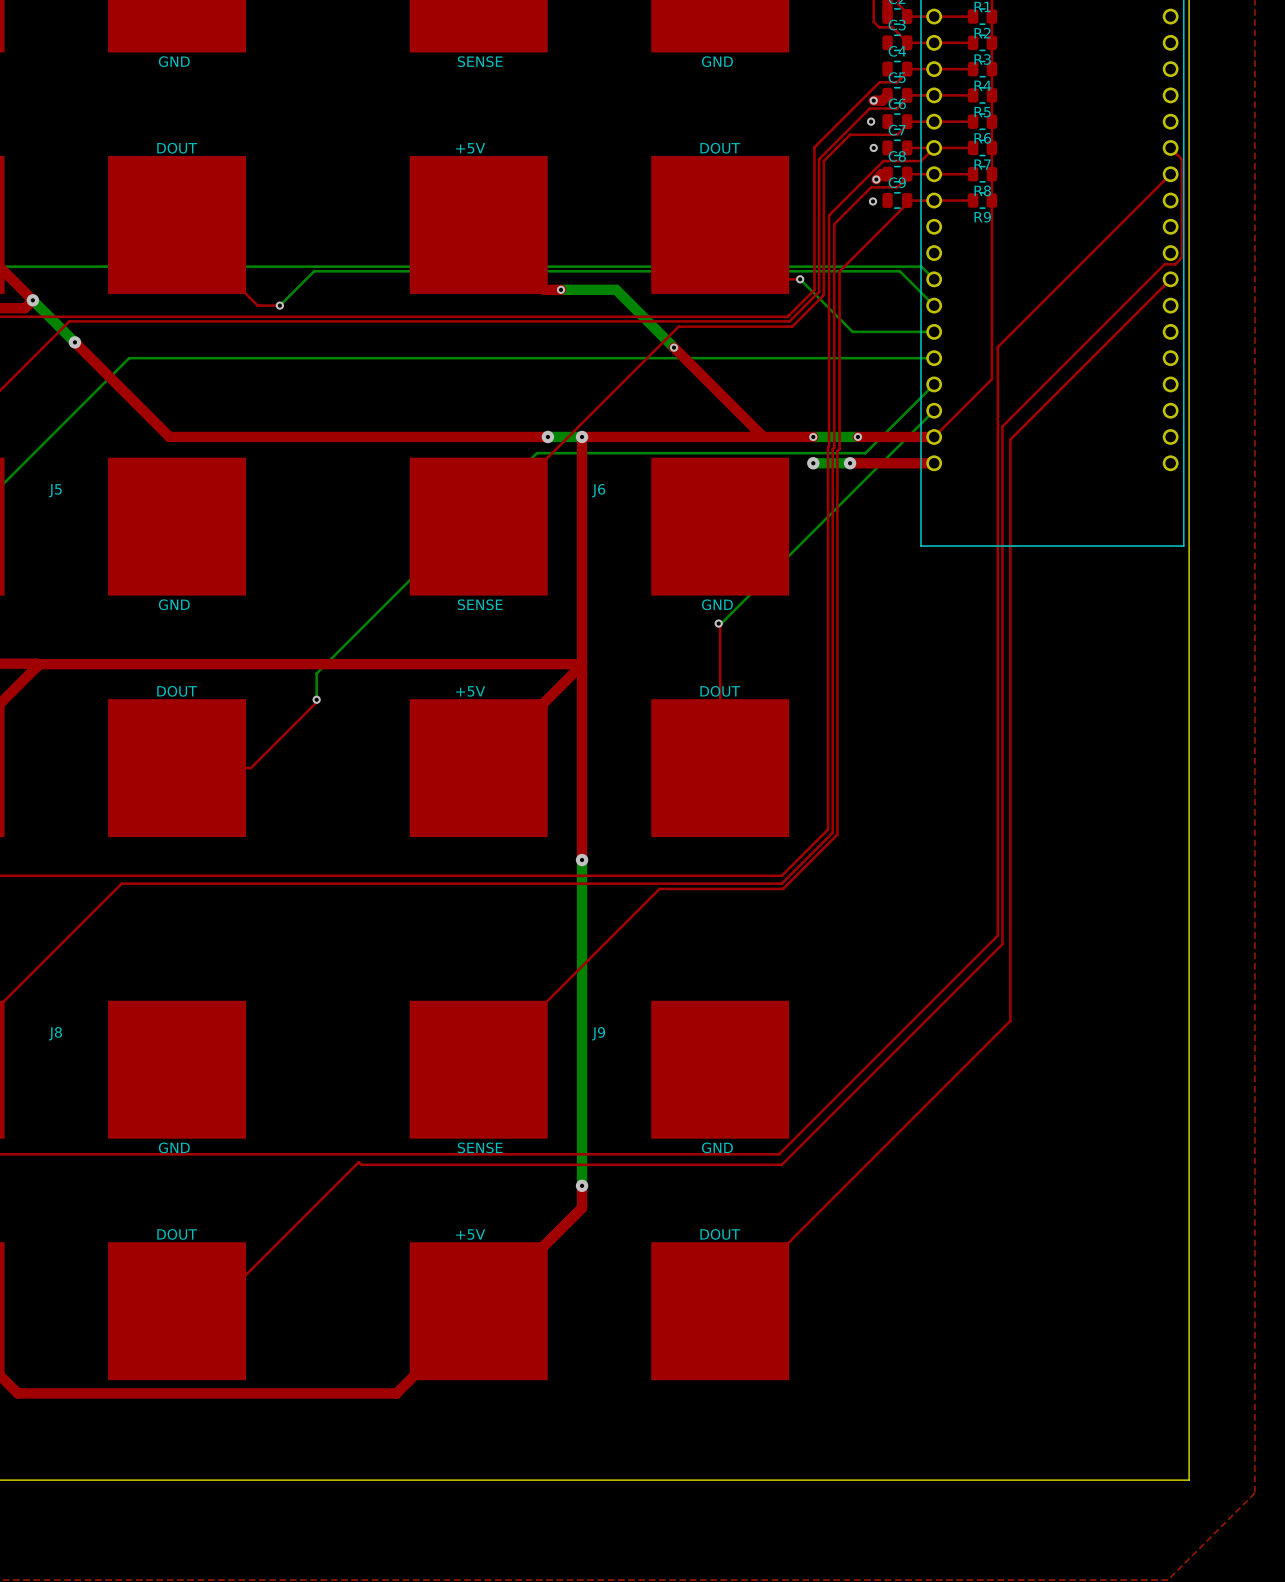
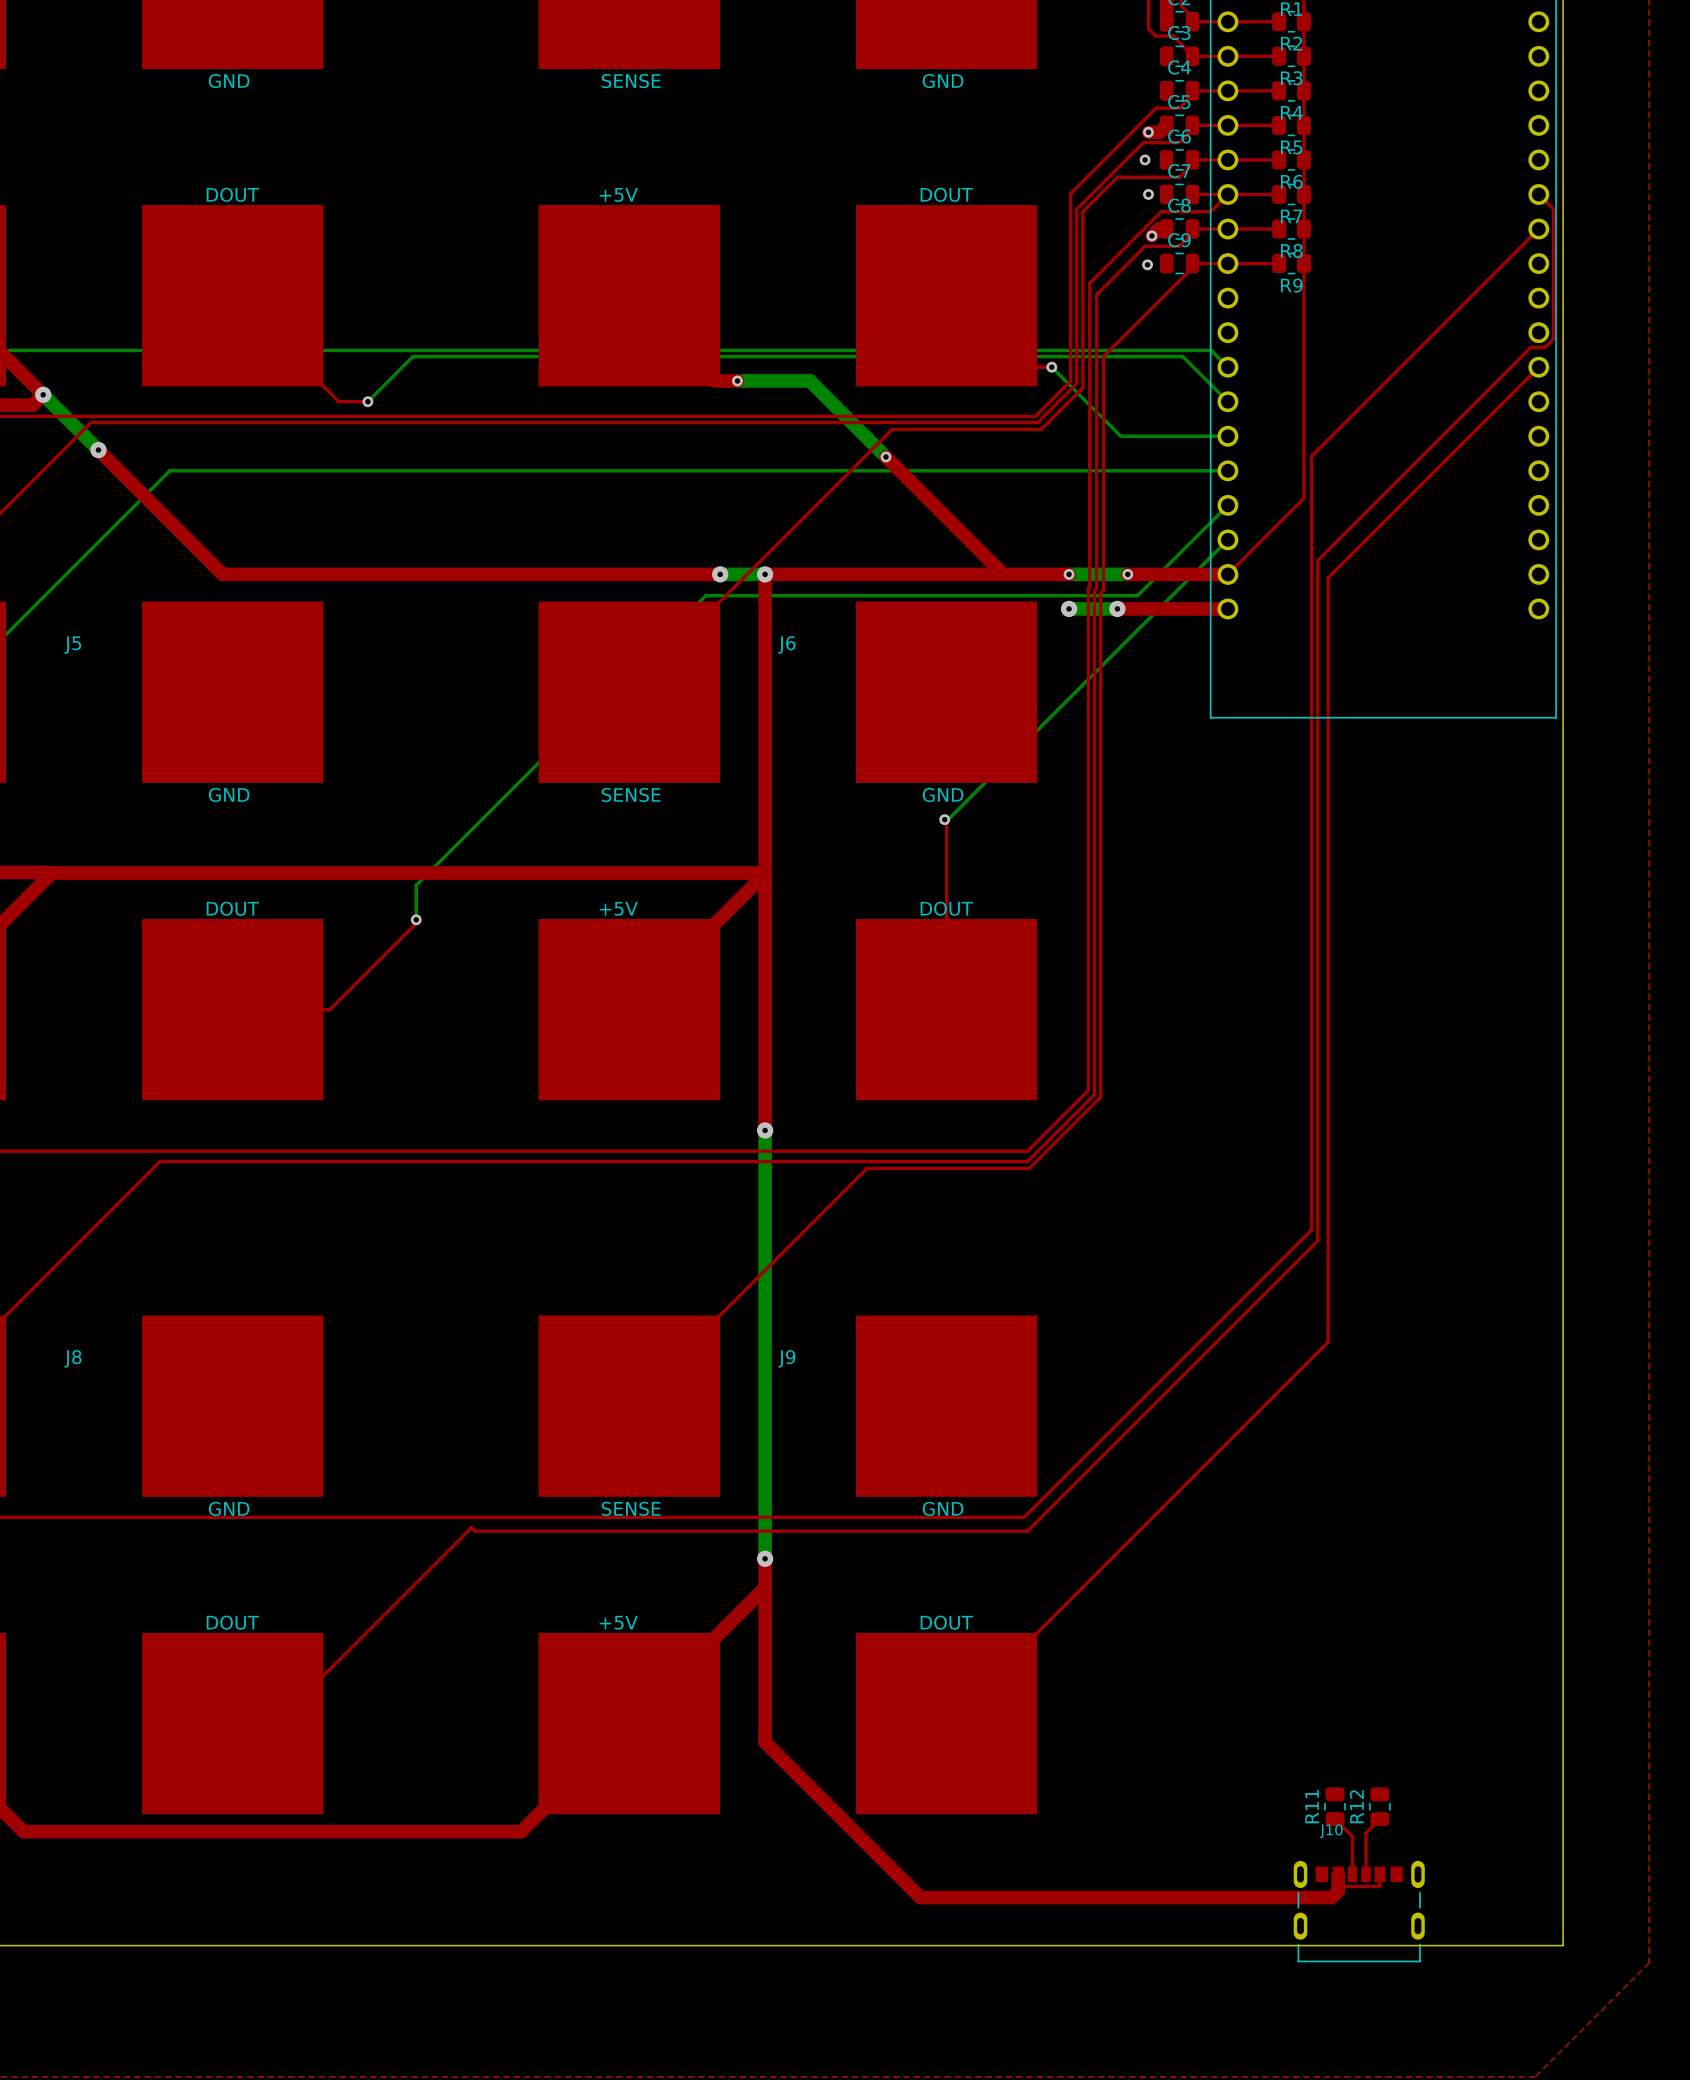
top track: none -> (765, 1587) (765, 1742) (920, 1897) (1331, 1897) (1338, 1891) (1338, 1874)
R11: none -> (1335, 1806)
R12: none -> (1379, 1806)
top track: none -> (1335, 1819) (1352, 1836) (1352, 1874)
top track: none -> (1379, 1819) (1366, 1832) (1366, 1874)
top track: none -> (1338, 1868) (1339, 1886) (1378, 1886) (1379, 1874)
J10: none -> (1359, 1911)

